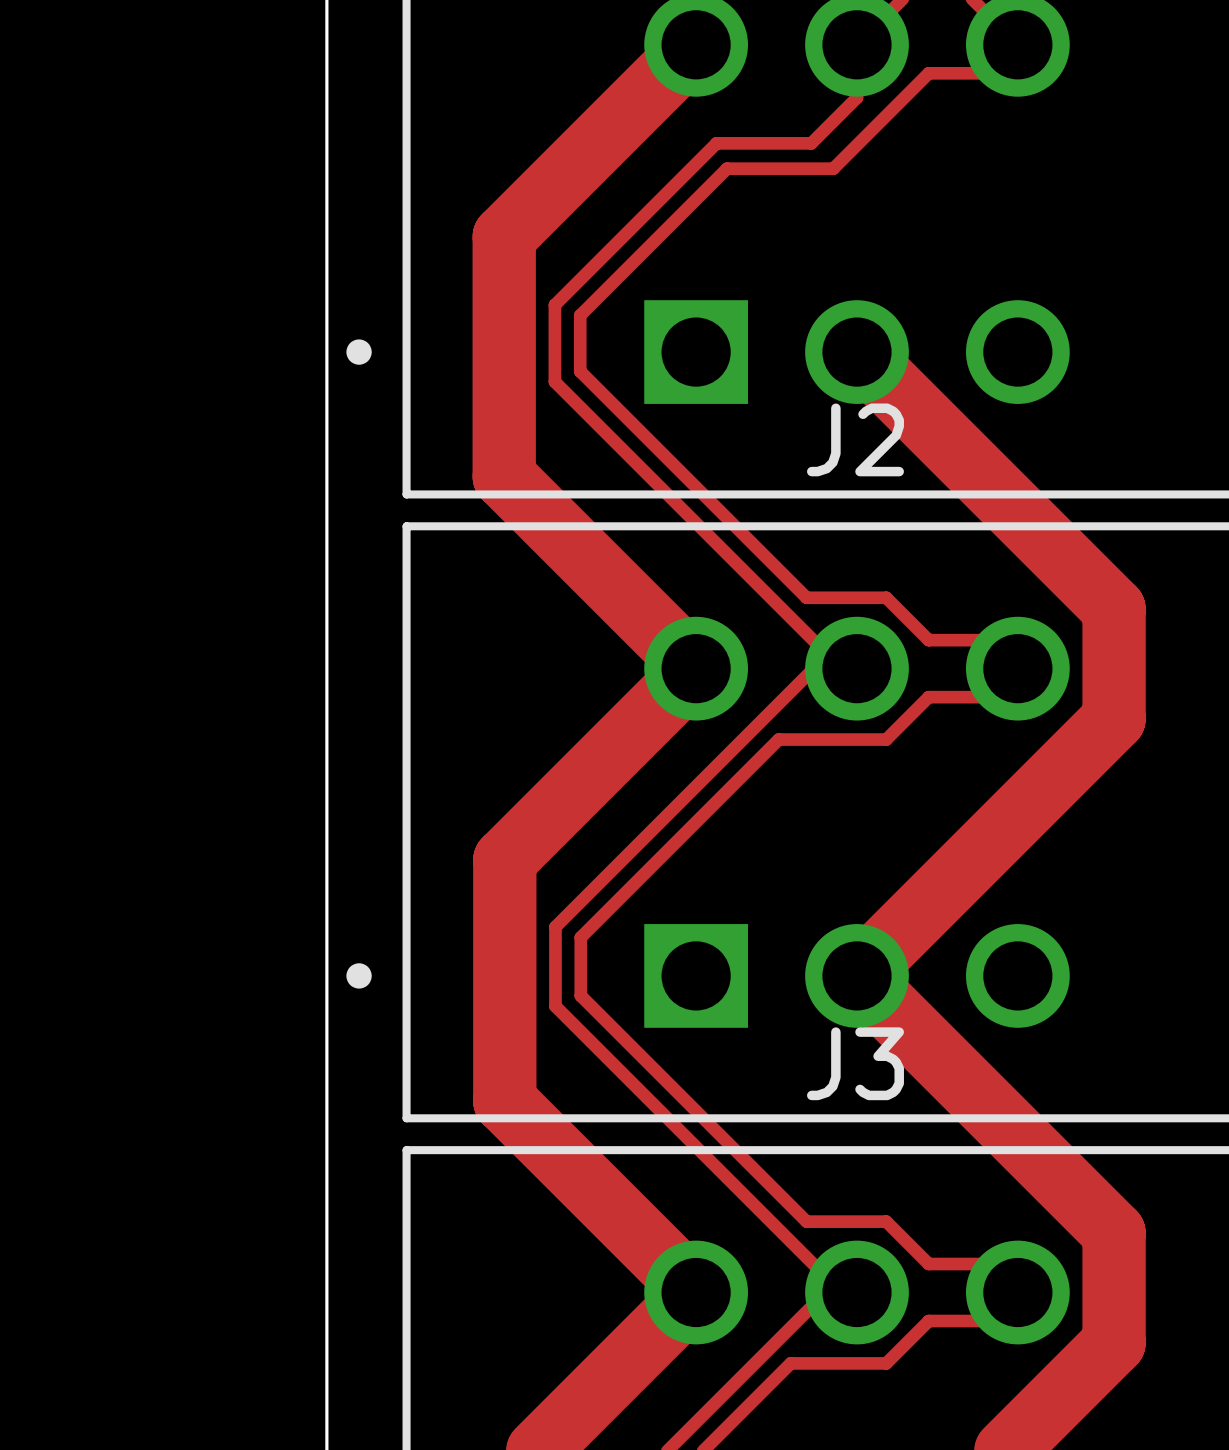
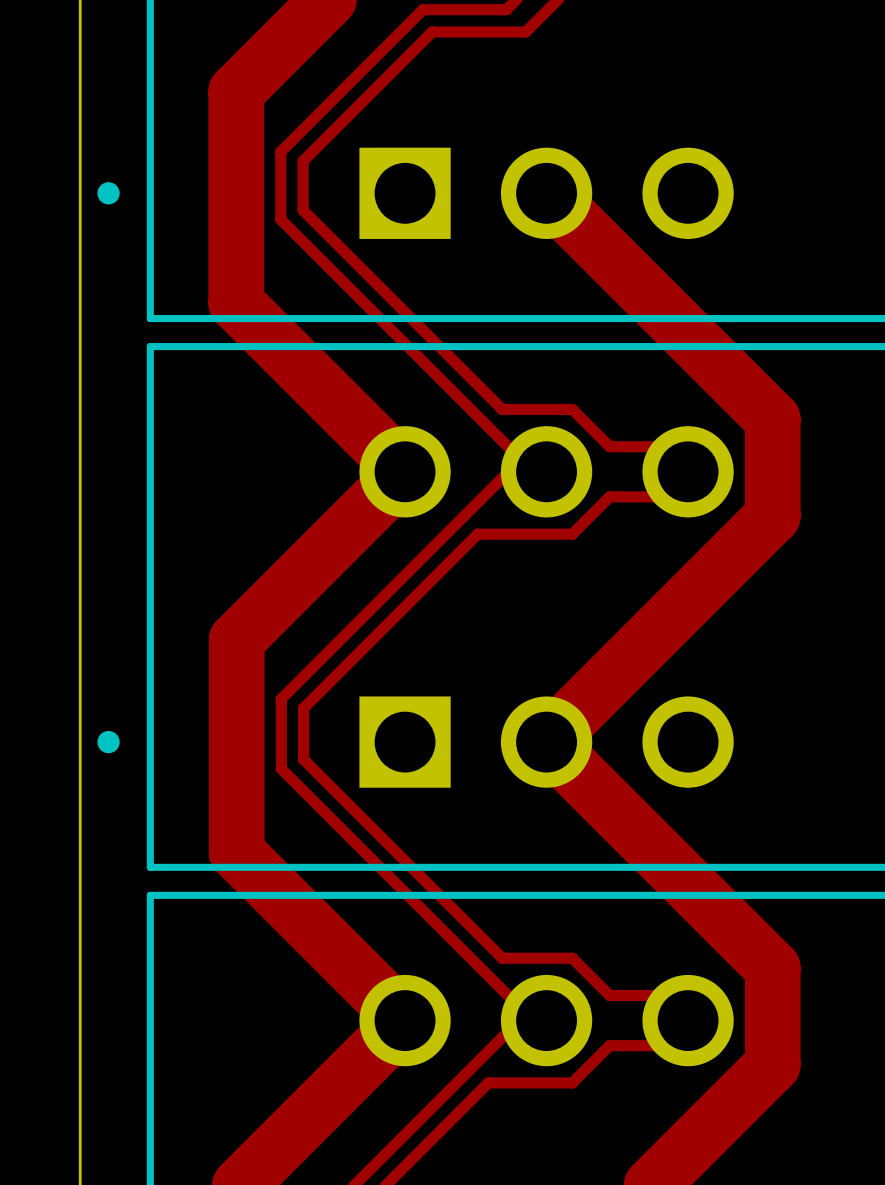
J2 name: J2 (855, 439) -> none
J3 name: J3 (855, 1063) -> none

